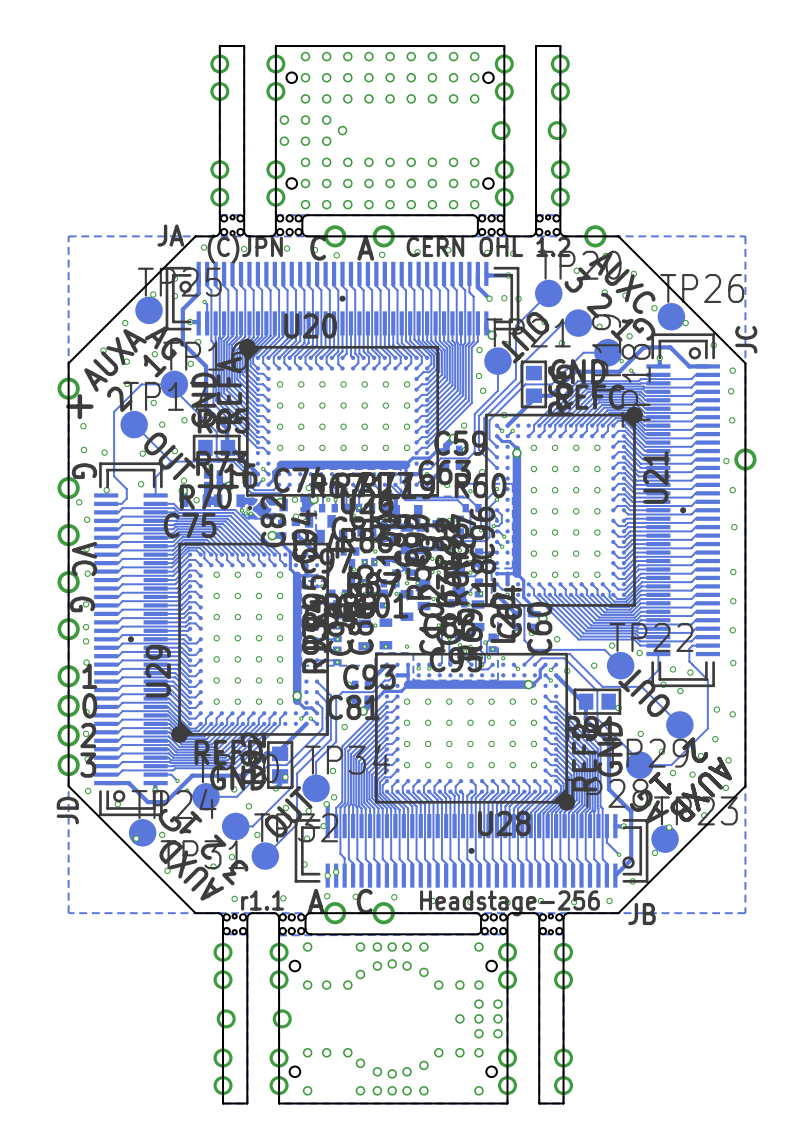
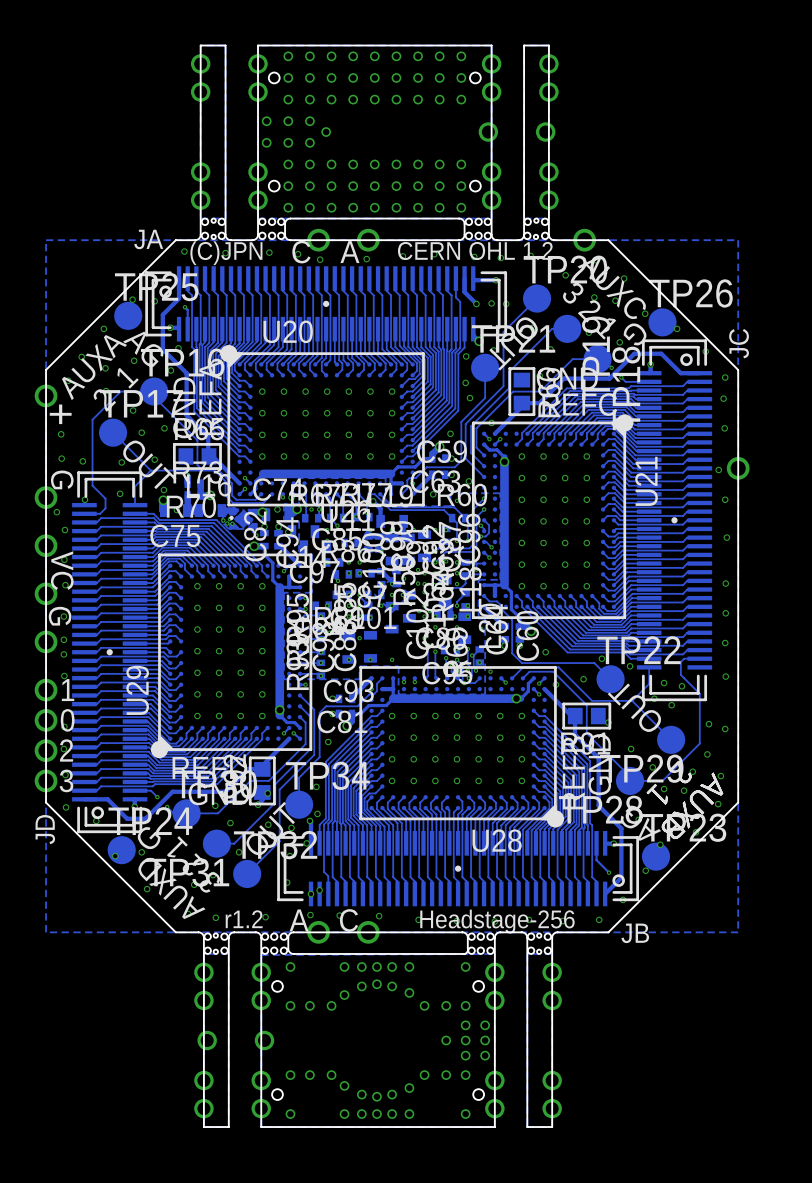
text: r1.1 (262, 900) -> r1.2 (244, 919)

